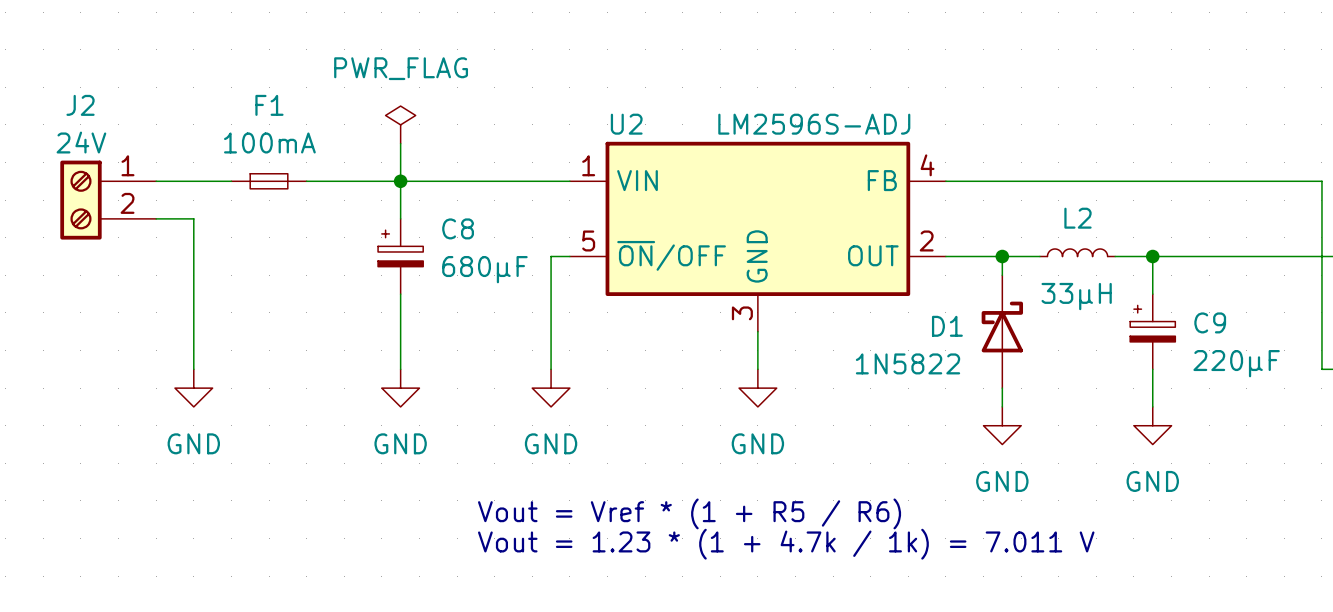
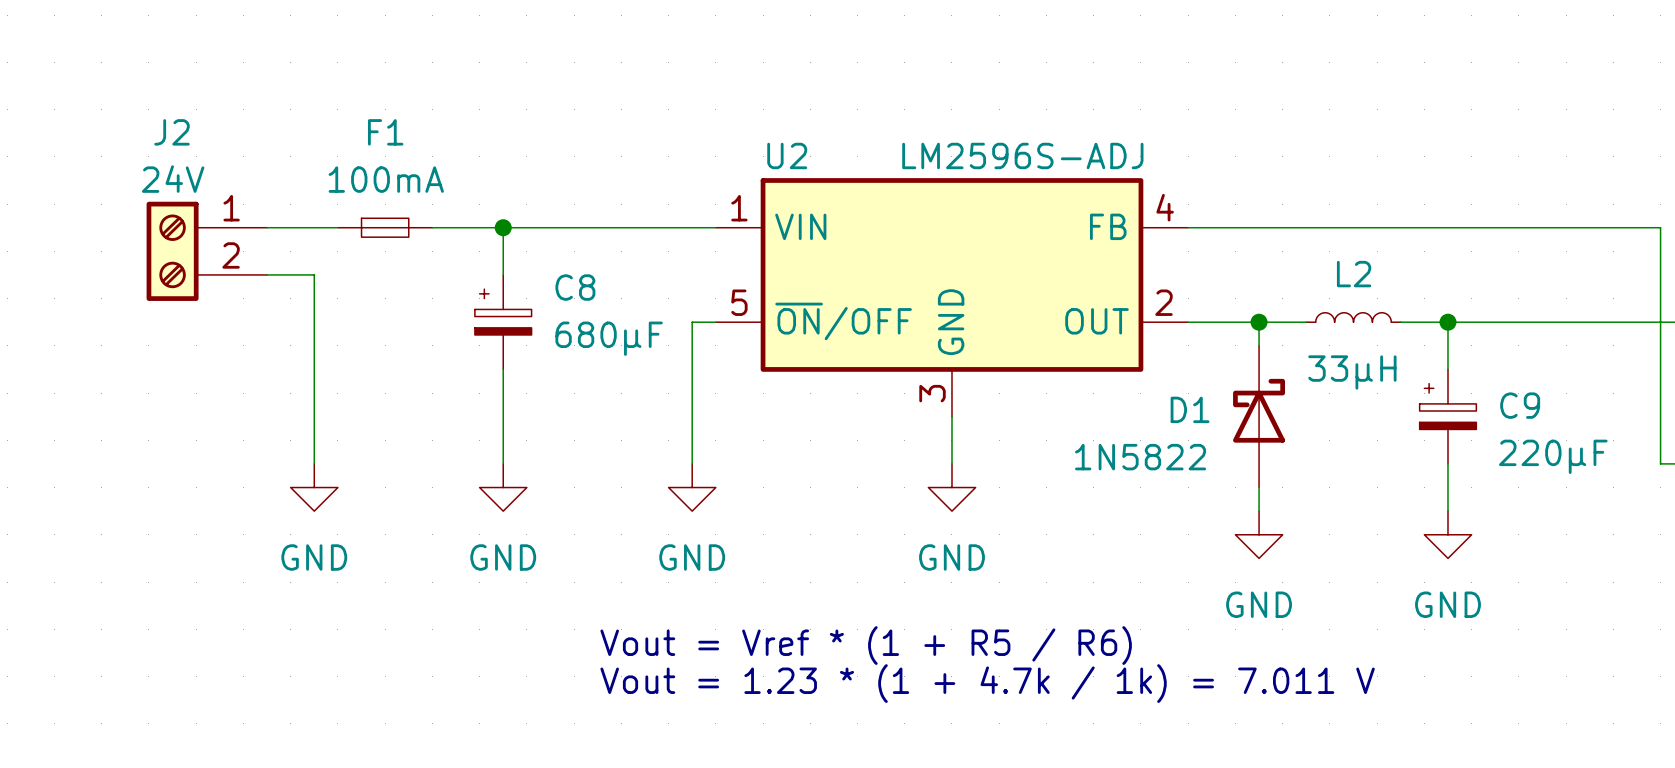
power symbol: PWR_FLAG (400, 124) -> none
wire: (400, 143) (400, 181) -> none
F1 position: (269, 181) -> (385, 227)
J2 position: (108, 200) -> (206, 251)
wire: (156, 218) (193, 218) (193, 369) -> (267, 274) (314, 274) (314, 463)
power symbol position: GND (193, 388) -> GND (314, 487)

